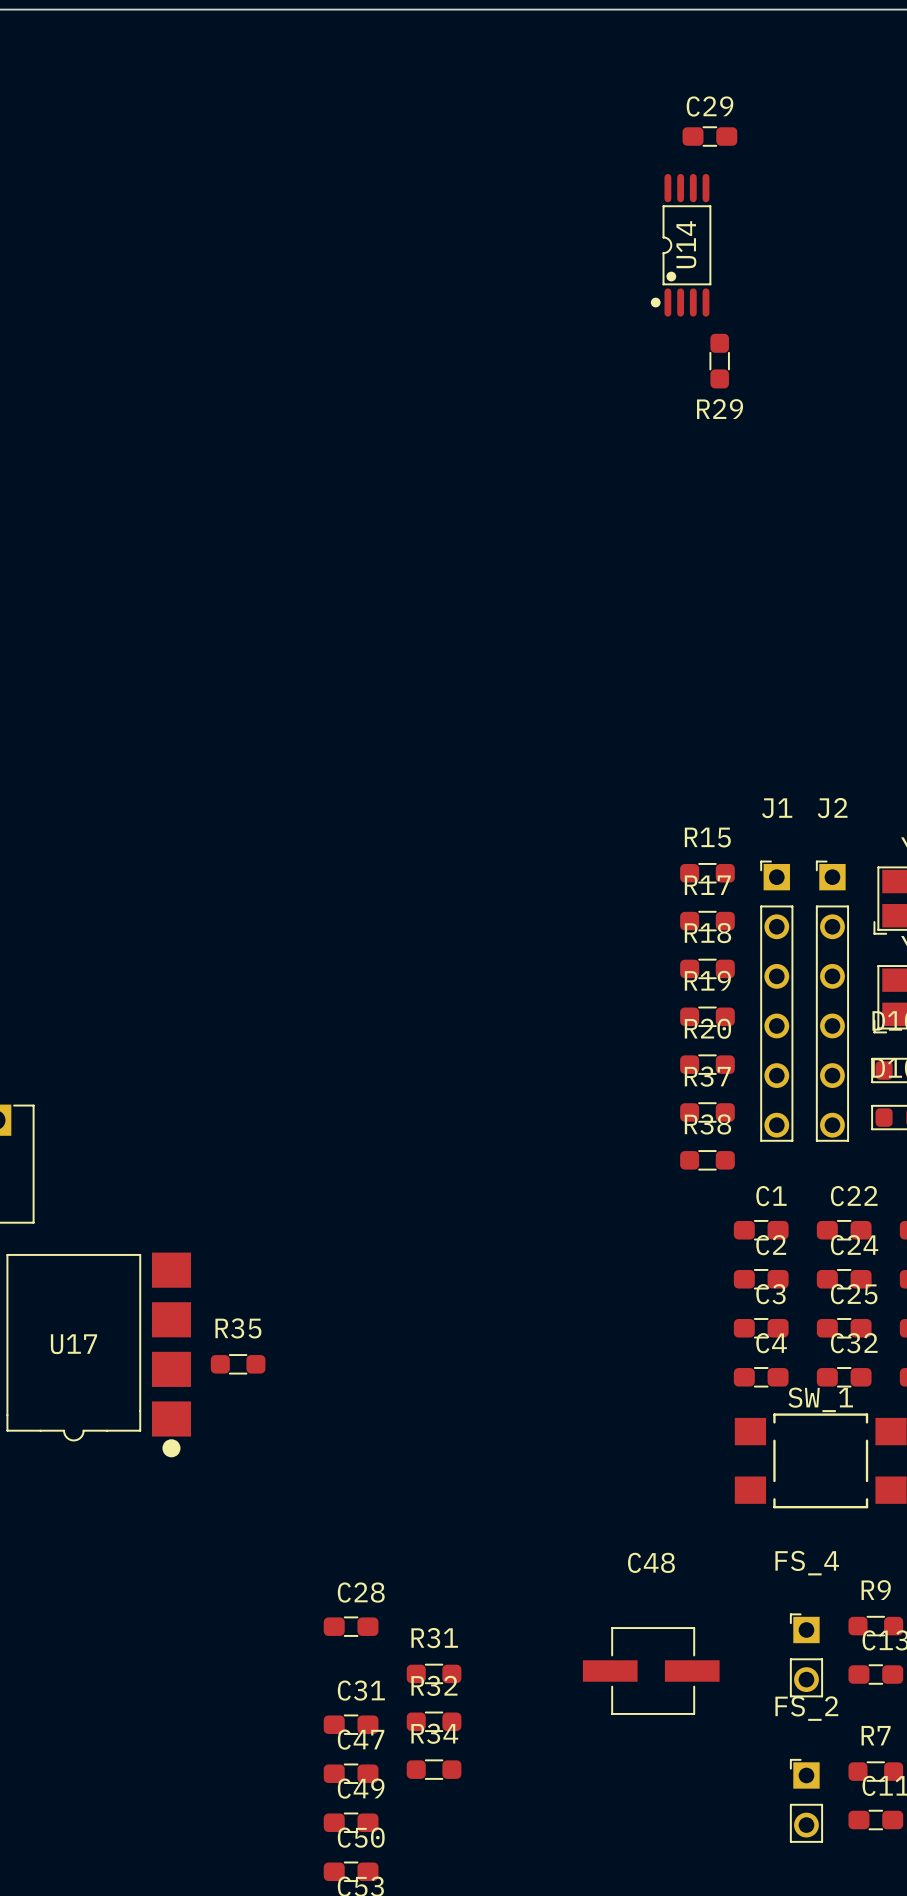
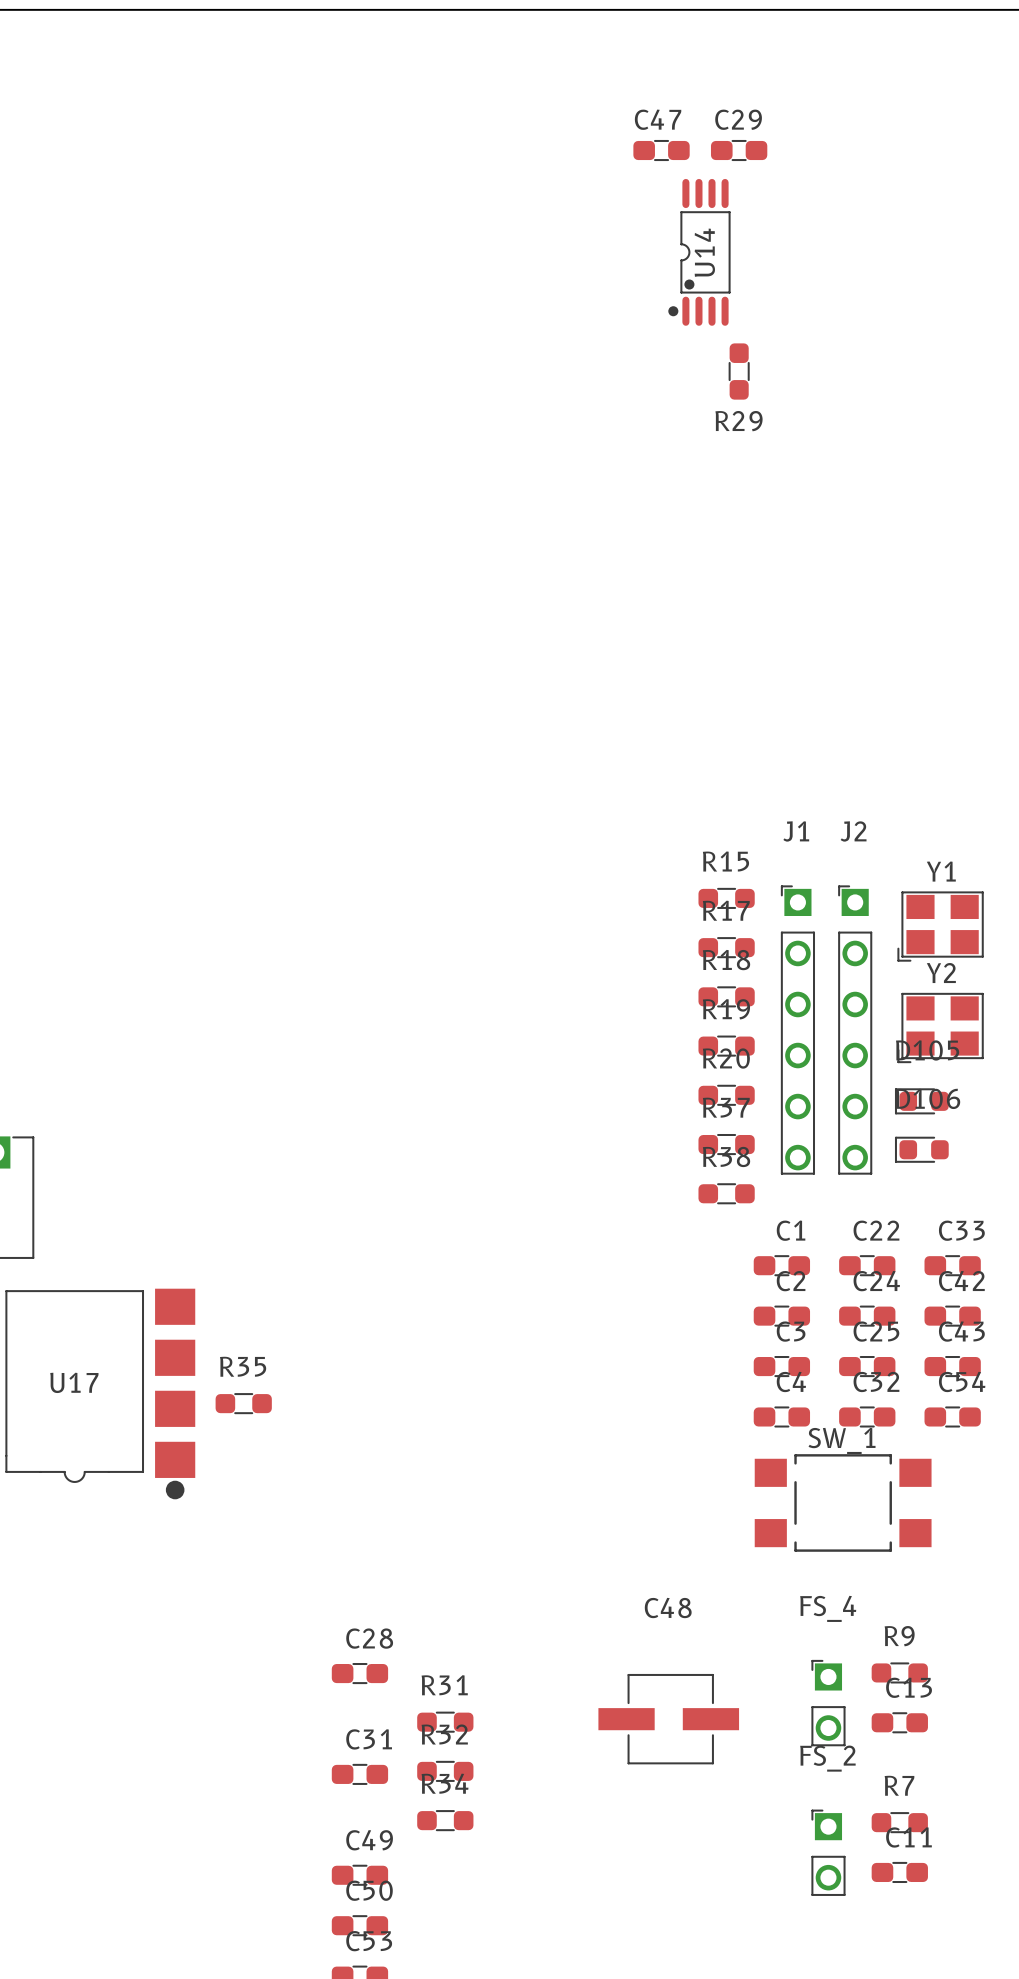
C29 position: (709, 136) -> (739, 150)
C47 name position: C47 (361, 1739) -> C47 (658, 119)
C47 position: (351, 1773) -> (661, 150)

